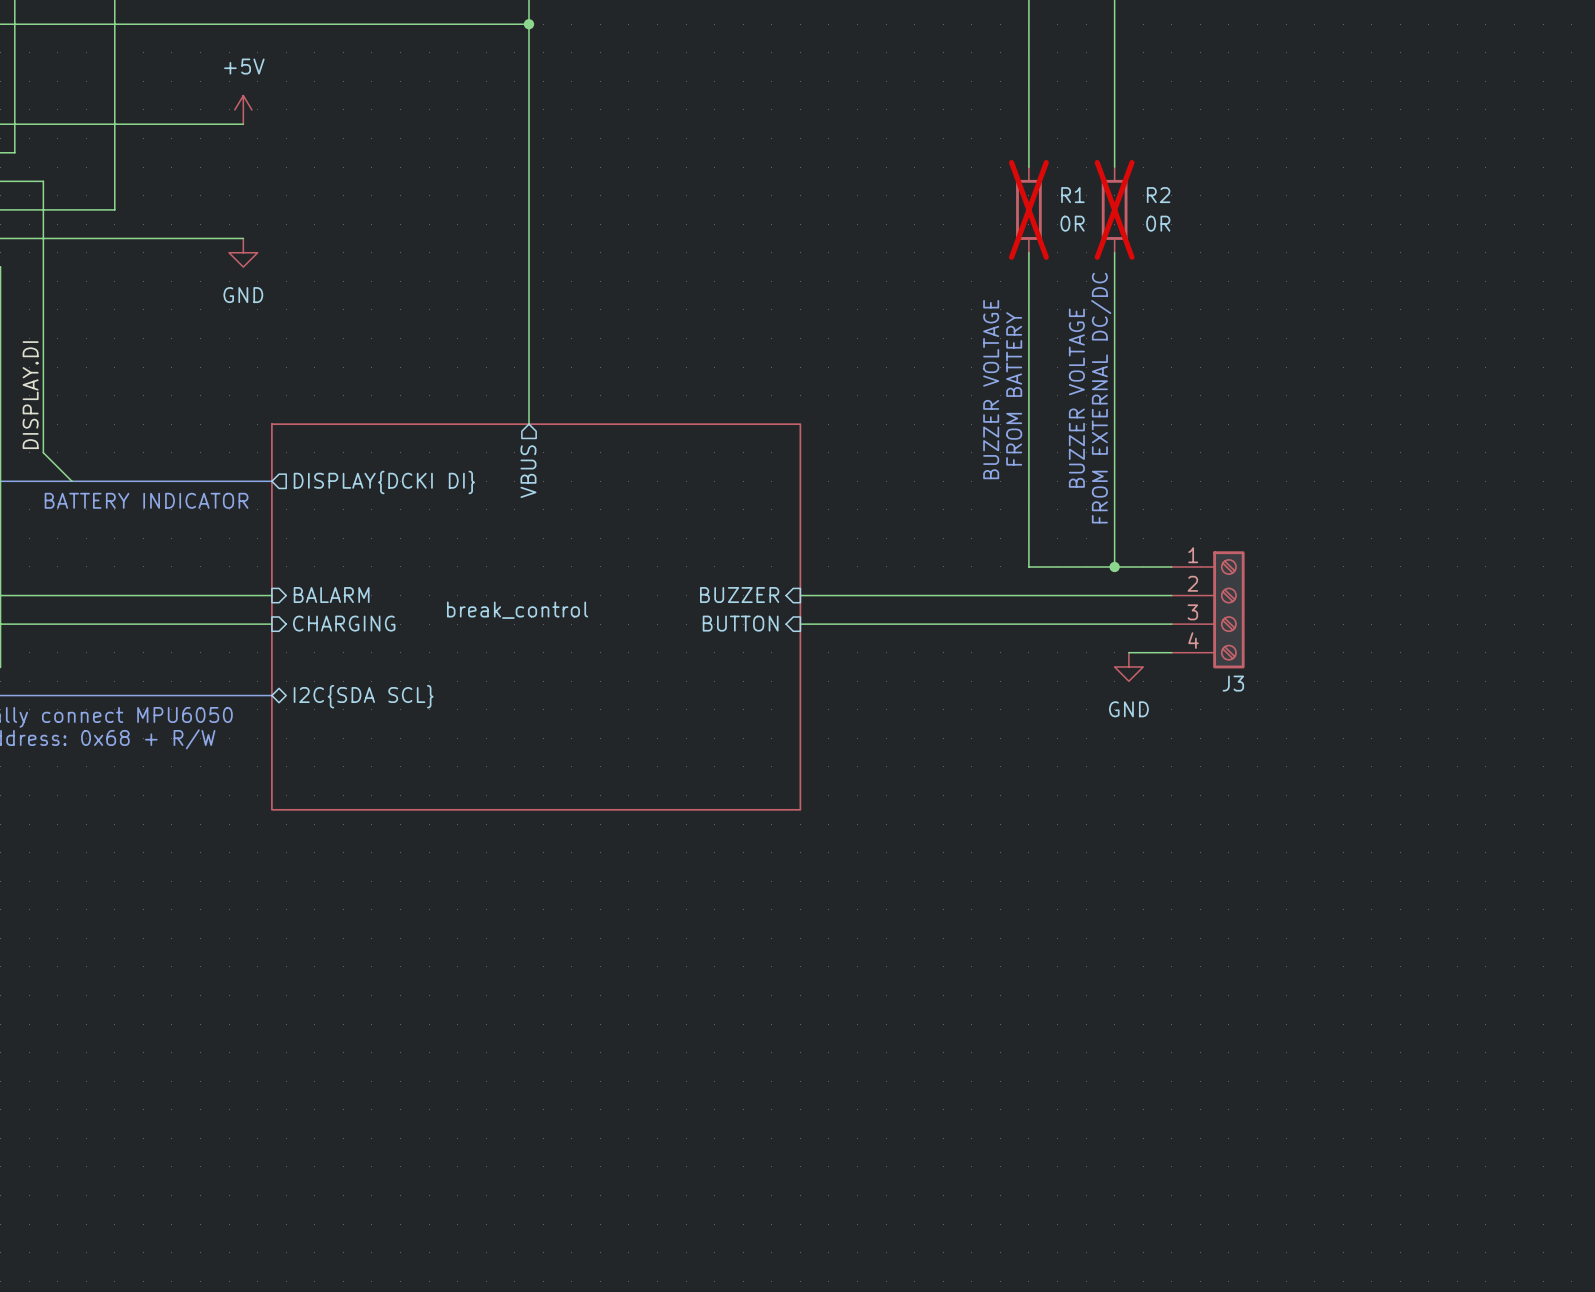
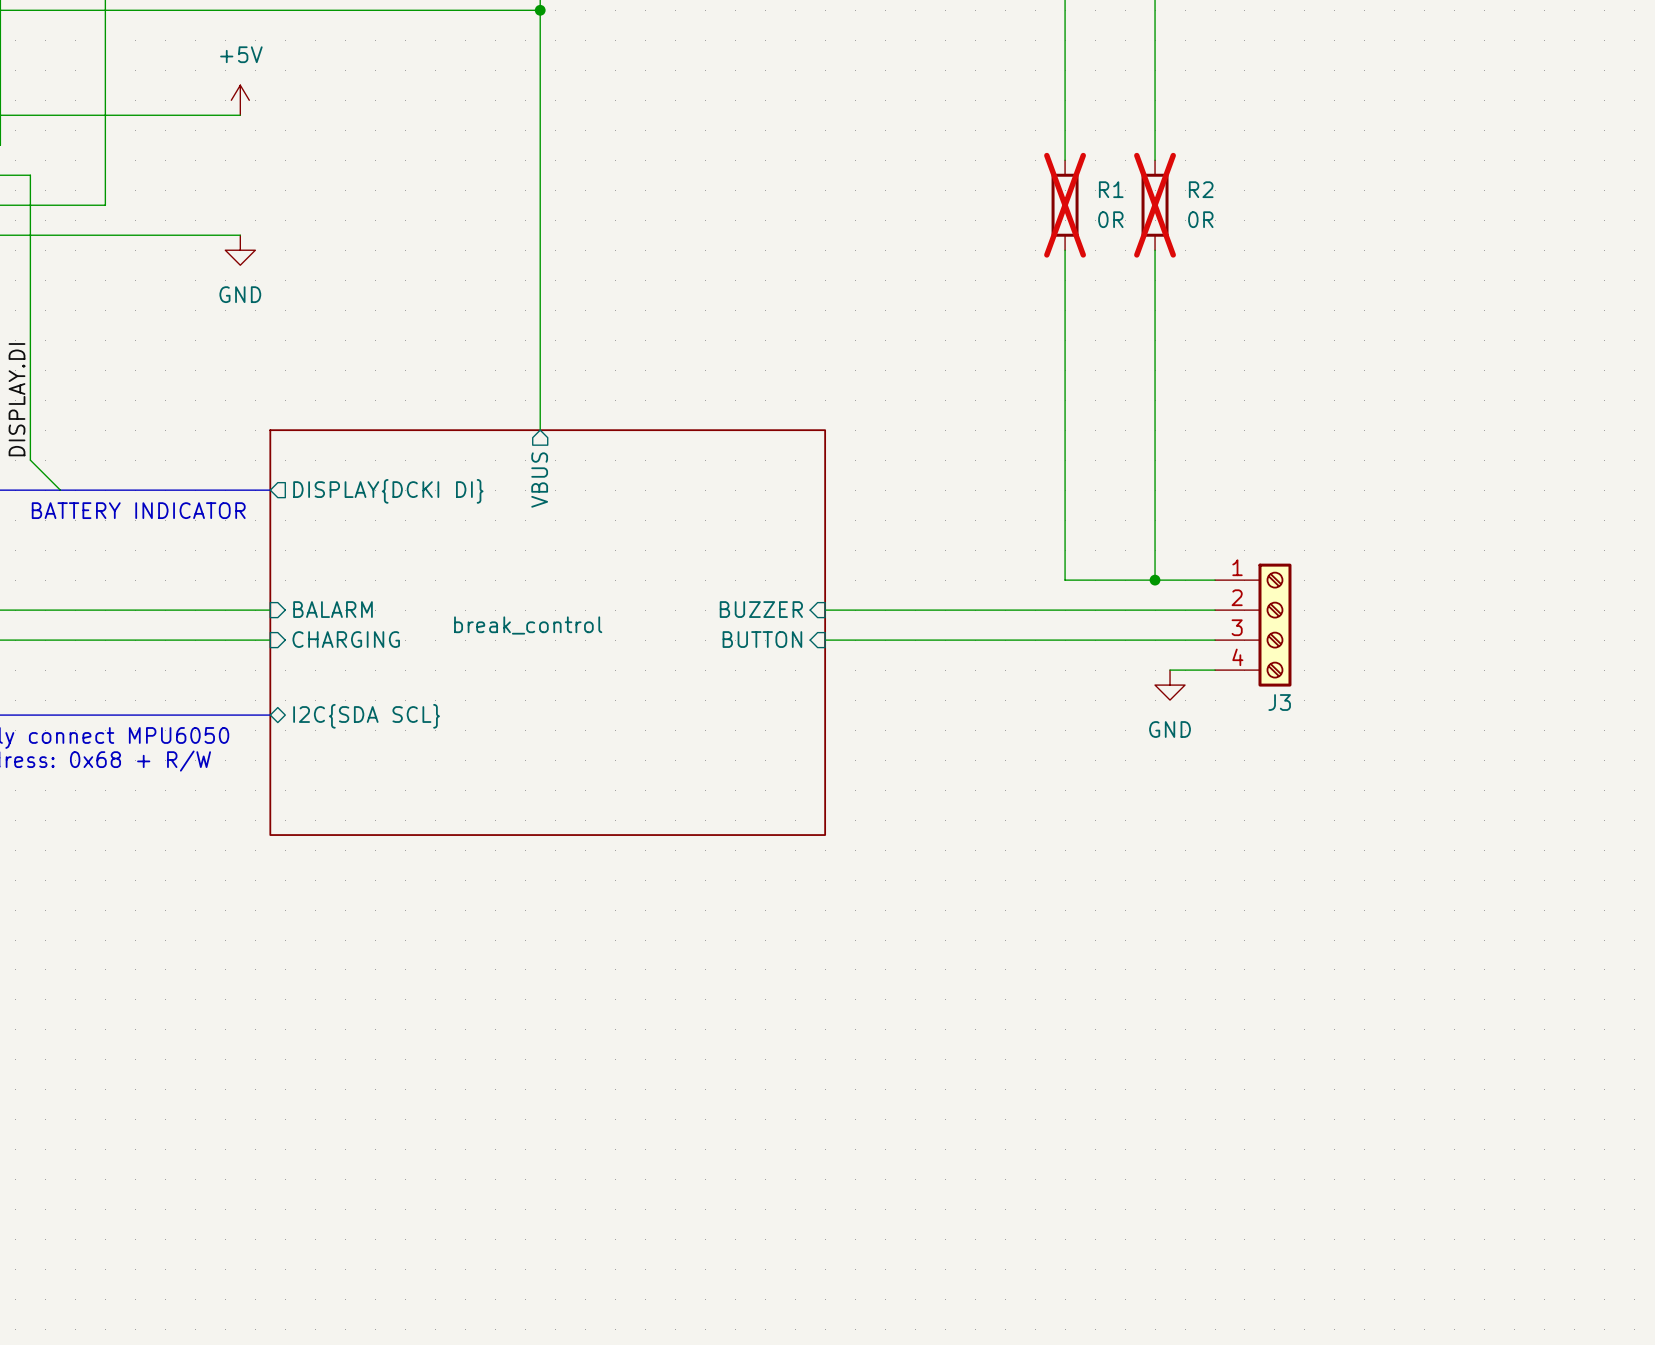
text: FROM BATTERY (1014, 388) -> none
text: BUZZER VOLTAGE (991, 389) -> none
text: BUZZER VOLTAGE (1076, 398) -> none
text: FROM EXTERNAL DC/DC (1101, 398) -> none

